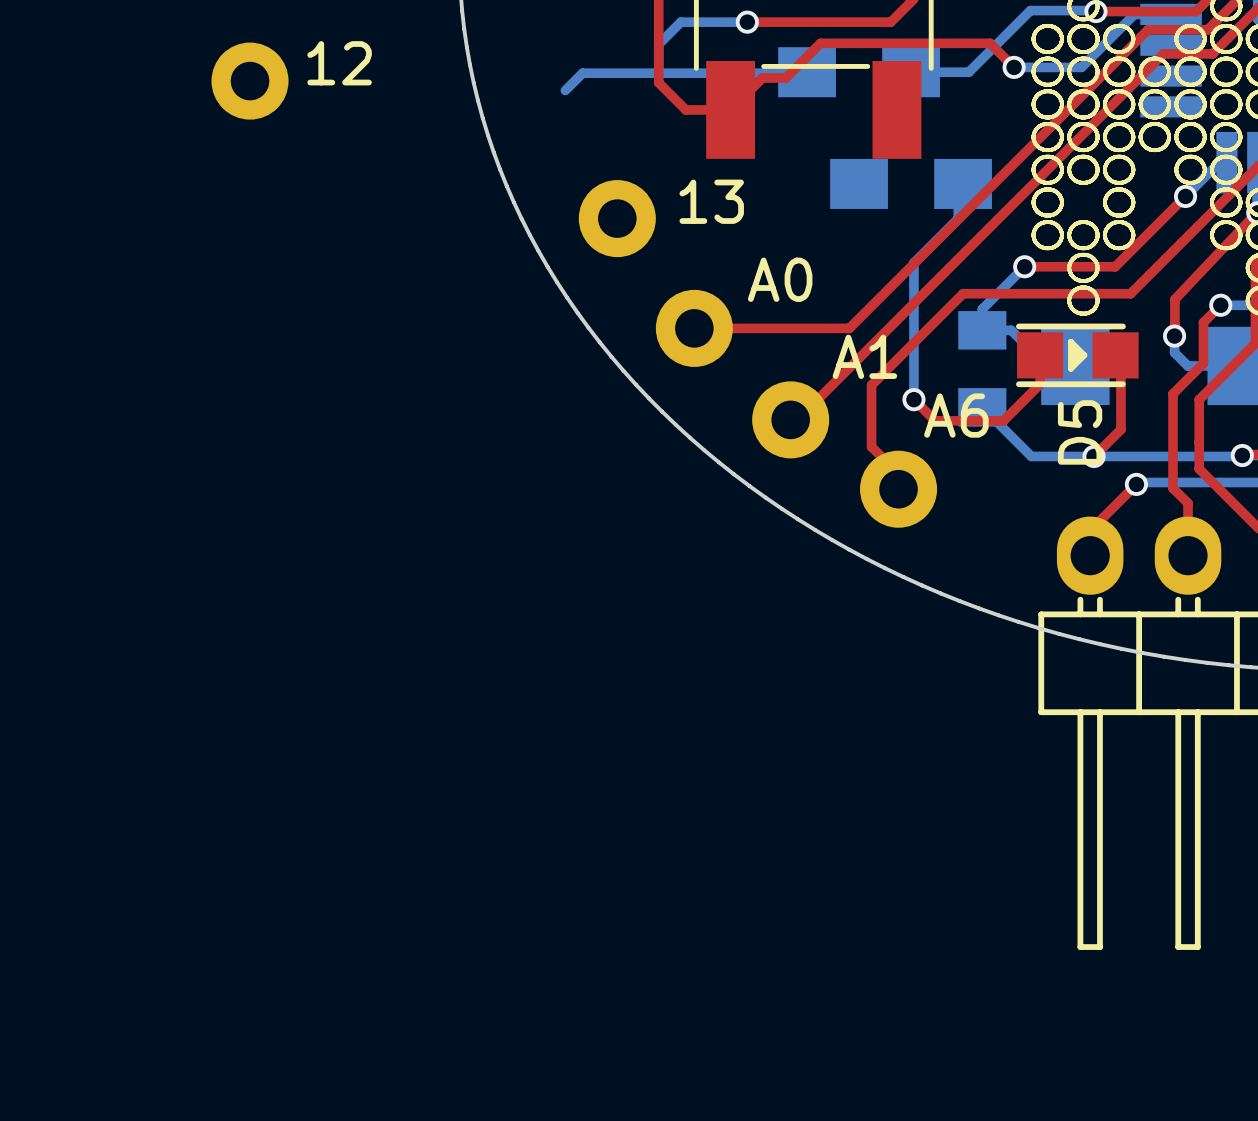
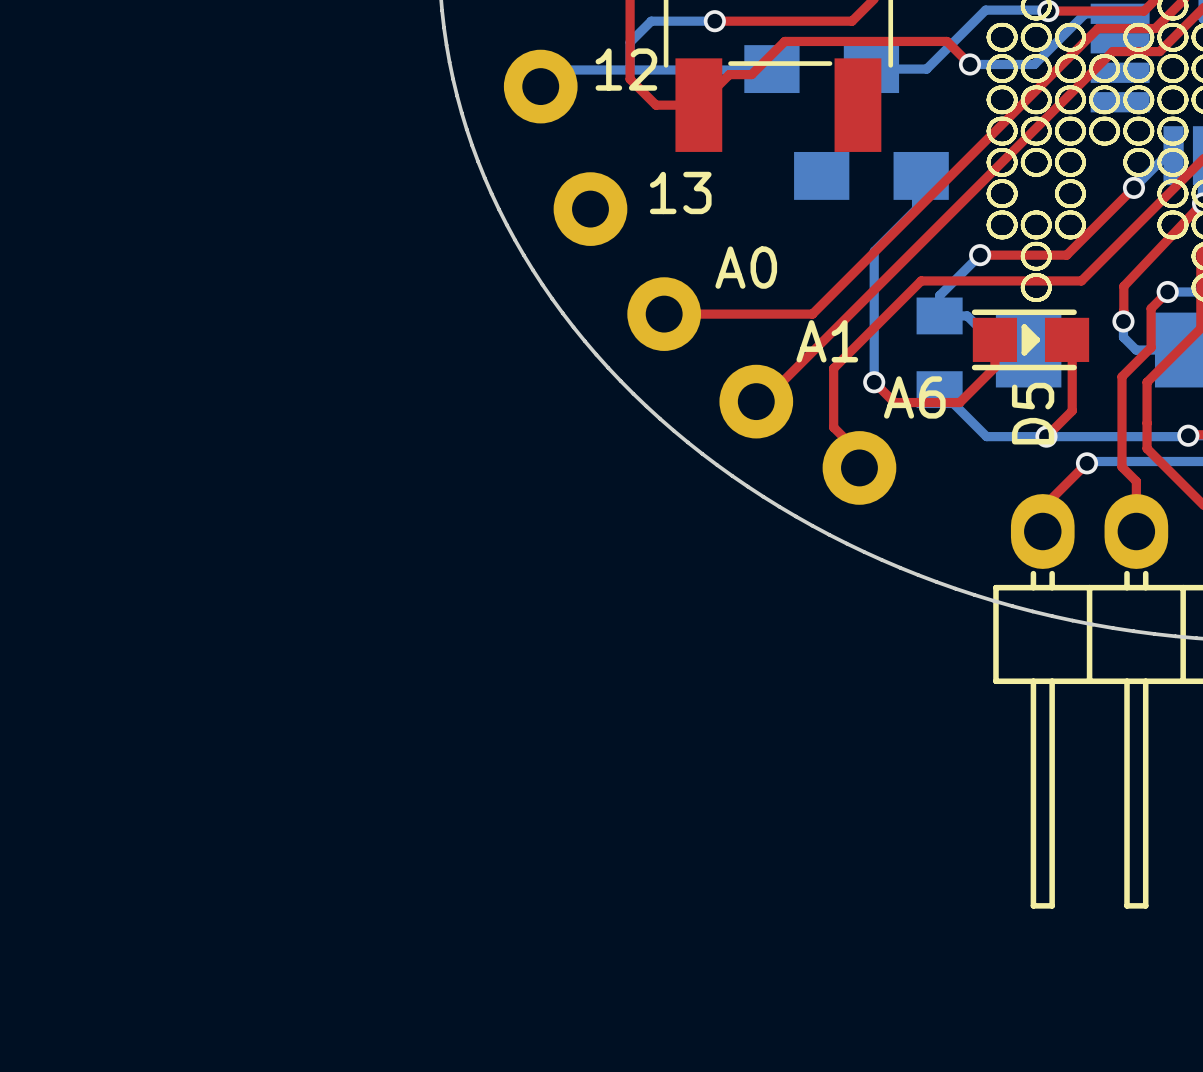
12 position: (250, 81) -> (540, 86)

